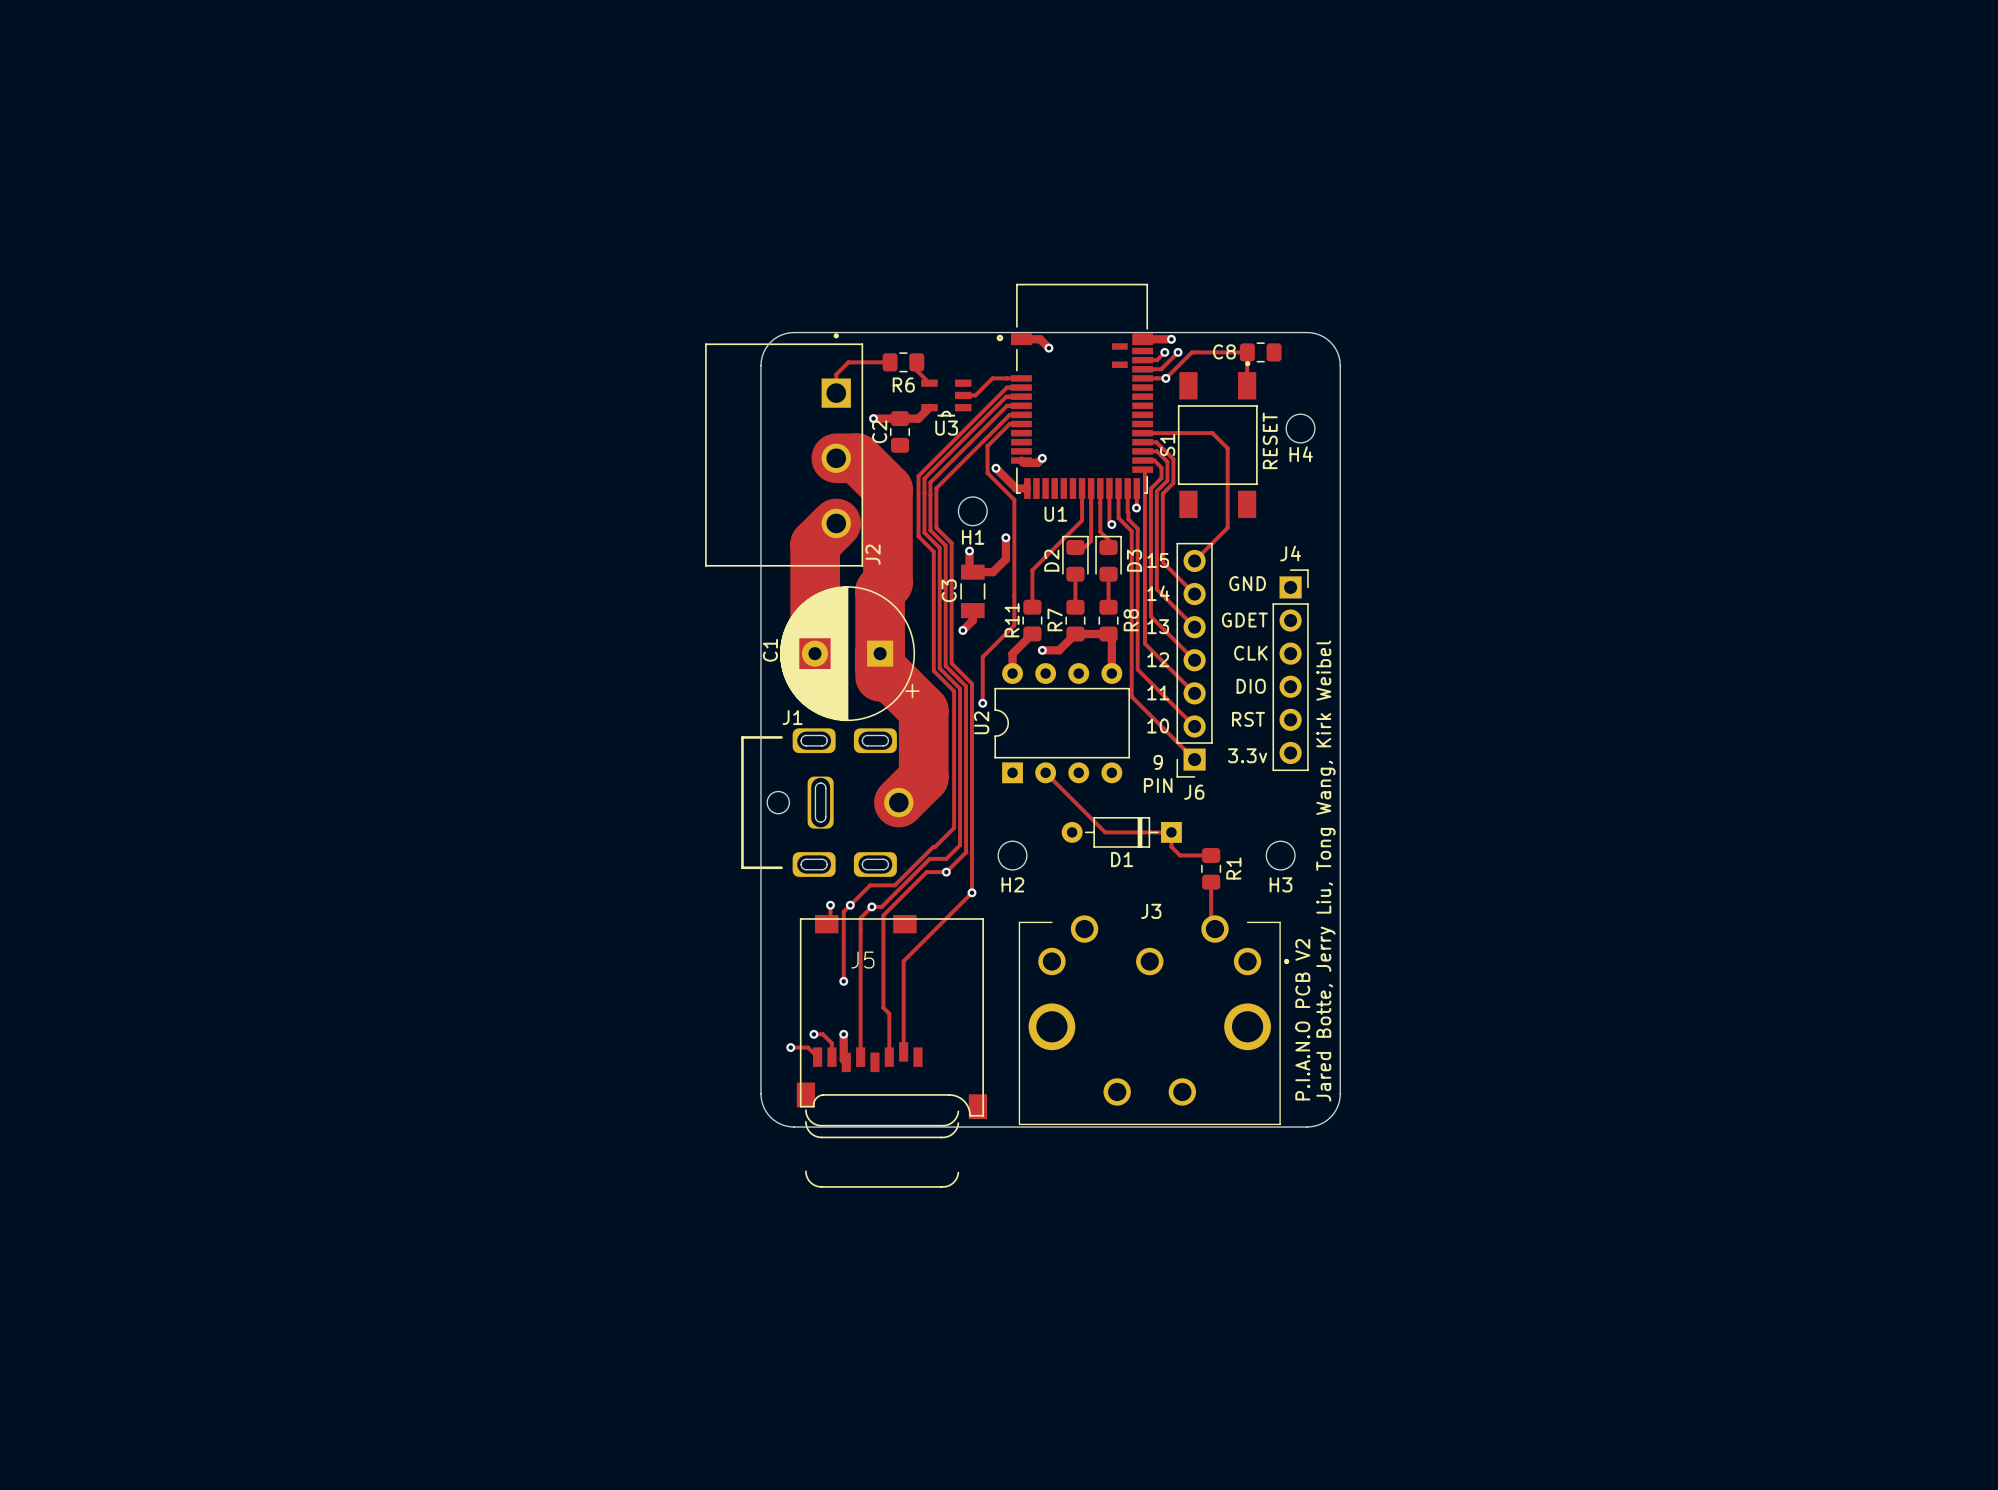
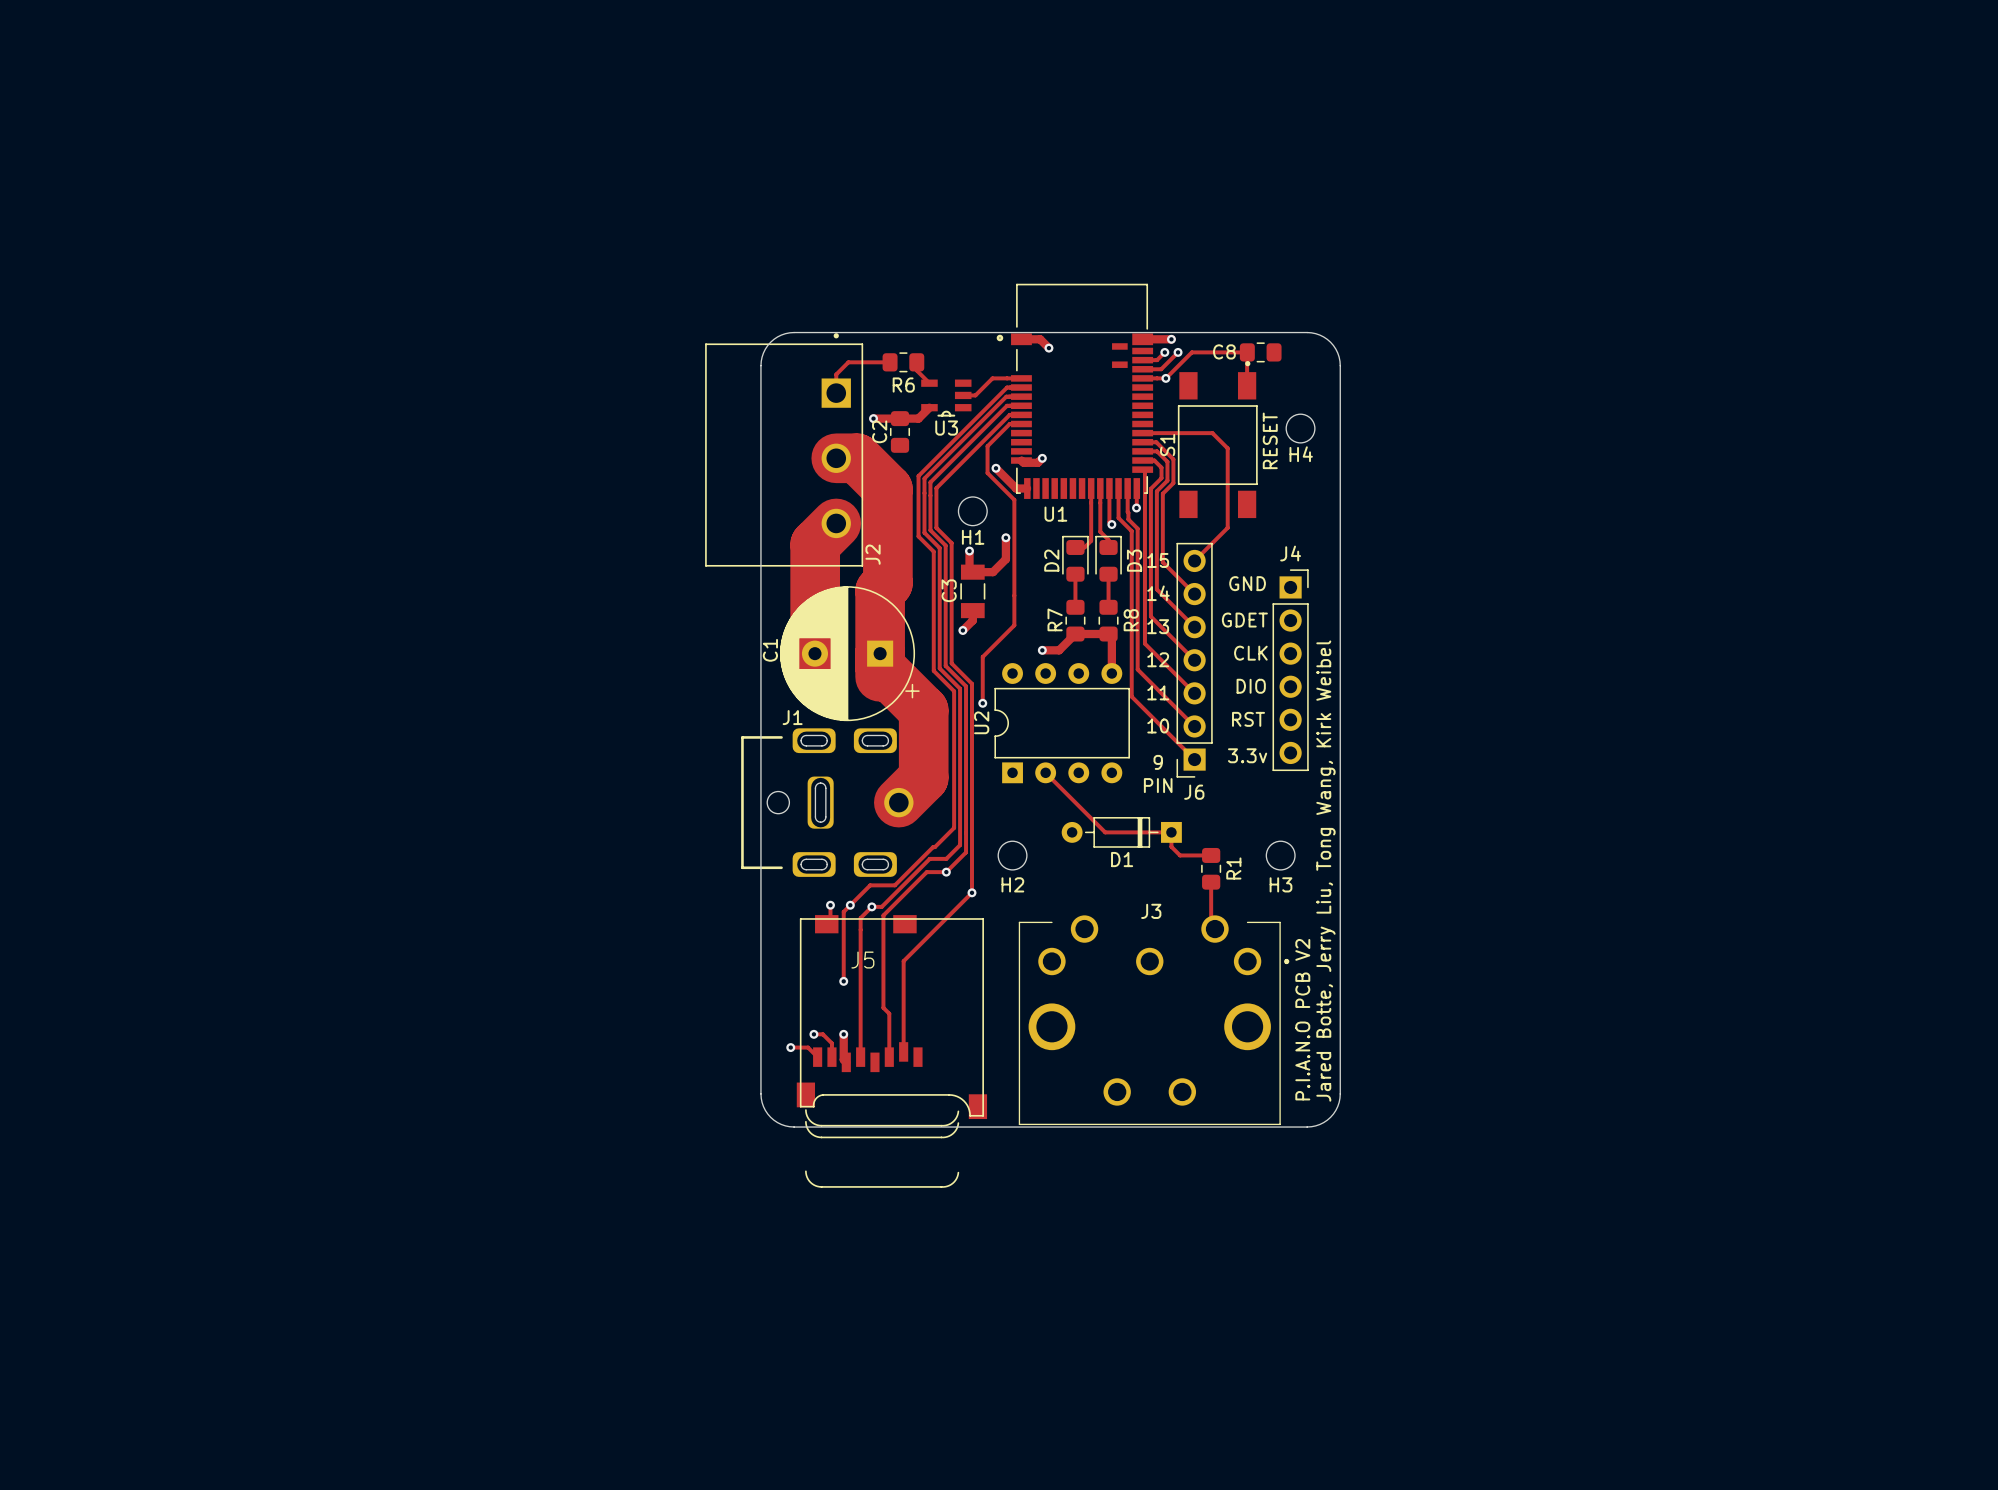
track: (1082, 488) (1082, 520) (1032, 570) (1032, 607) -> none
R11: (1032, 620) -> none
track: (1032, 633) (1012, 653) (1012, 673) -> none

